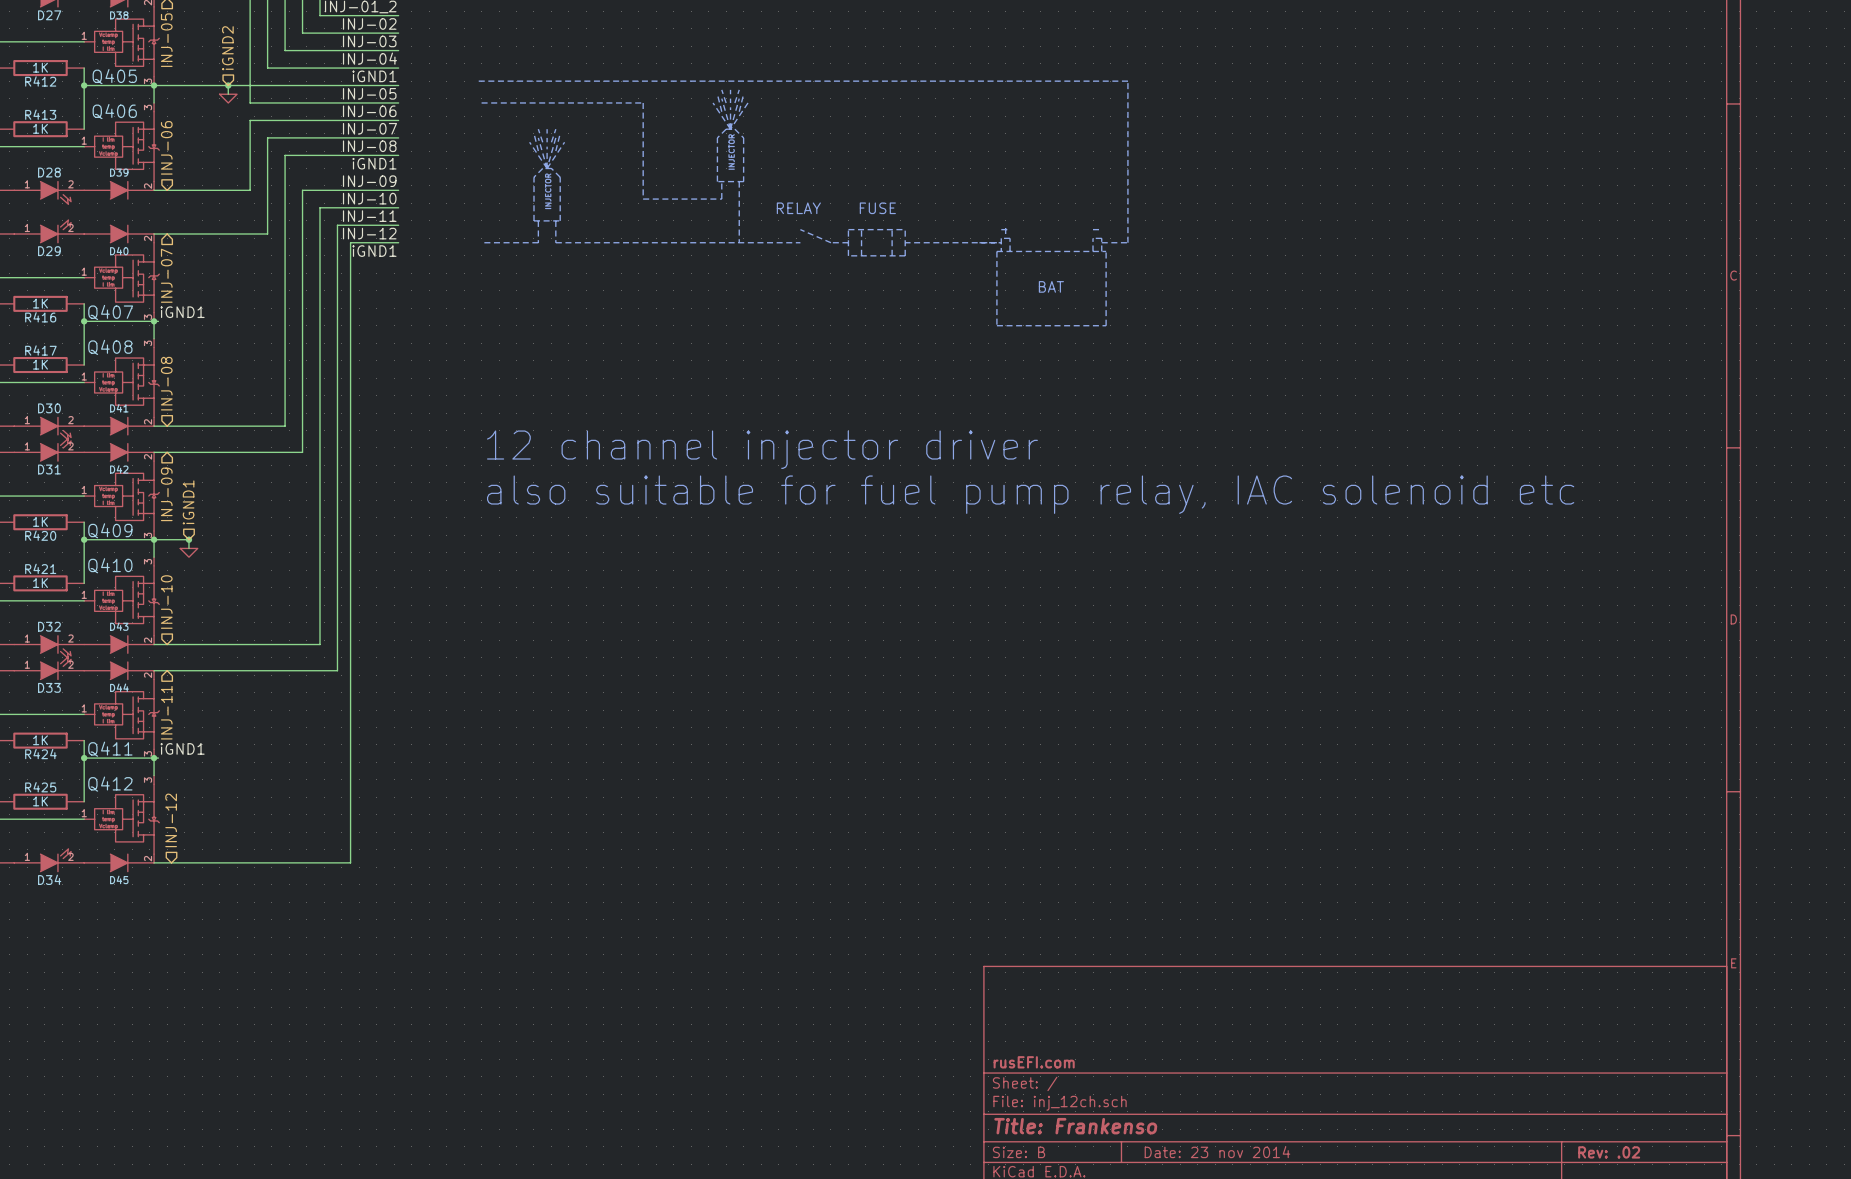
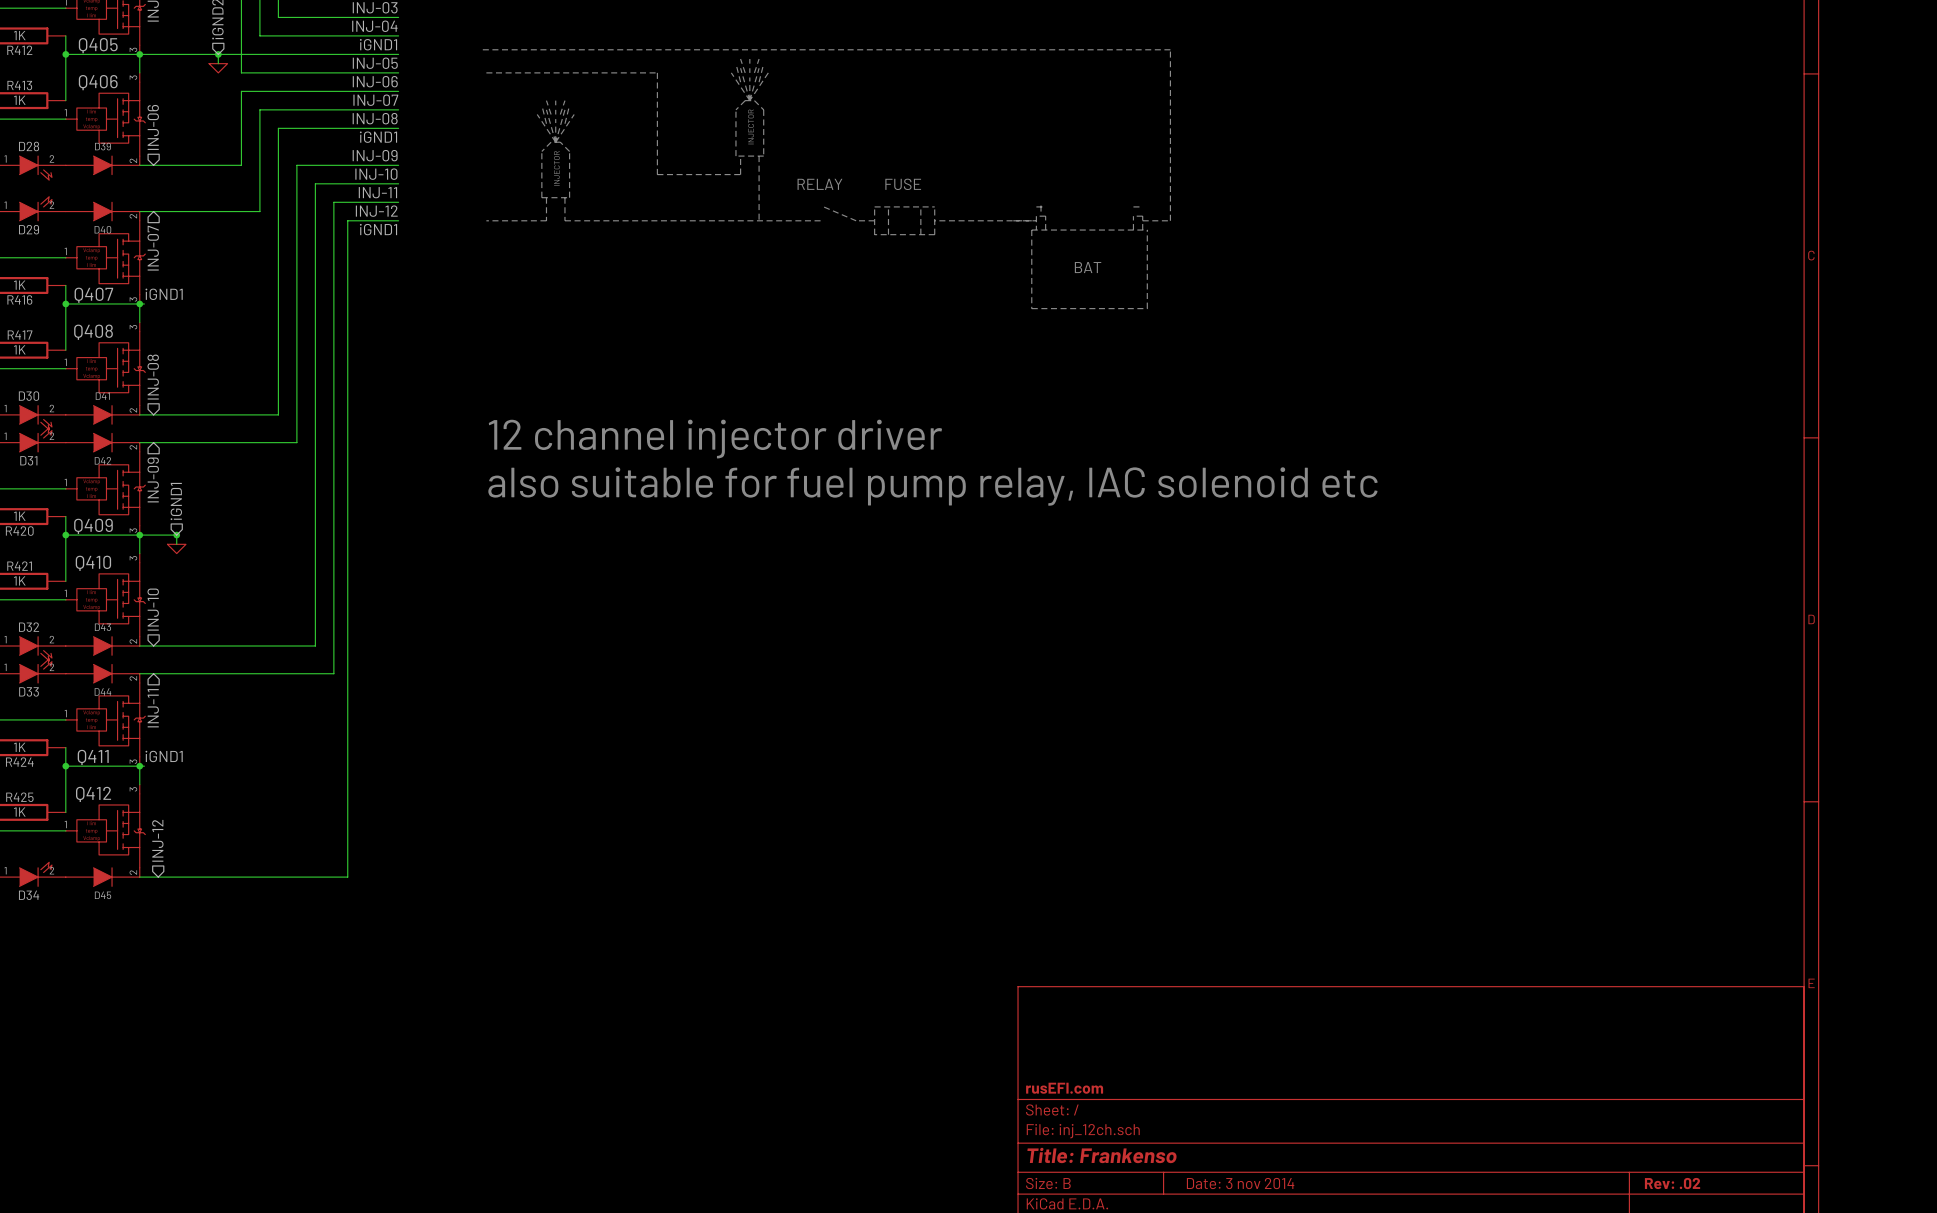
title block: Date: 23 nov 2014 (1217, 1152) -> Date: 3 nov 2014 (1240, 1183)

